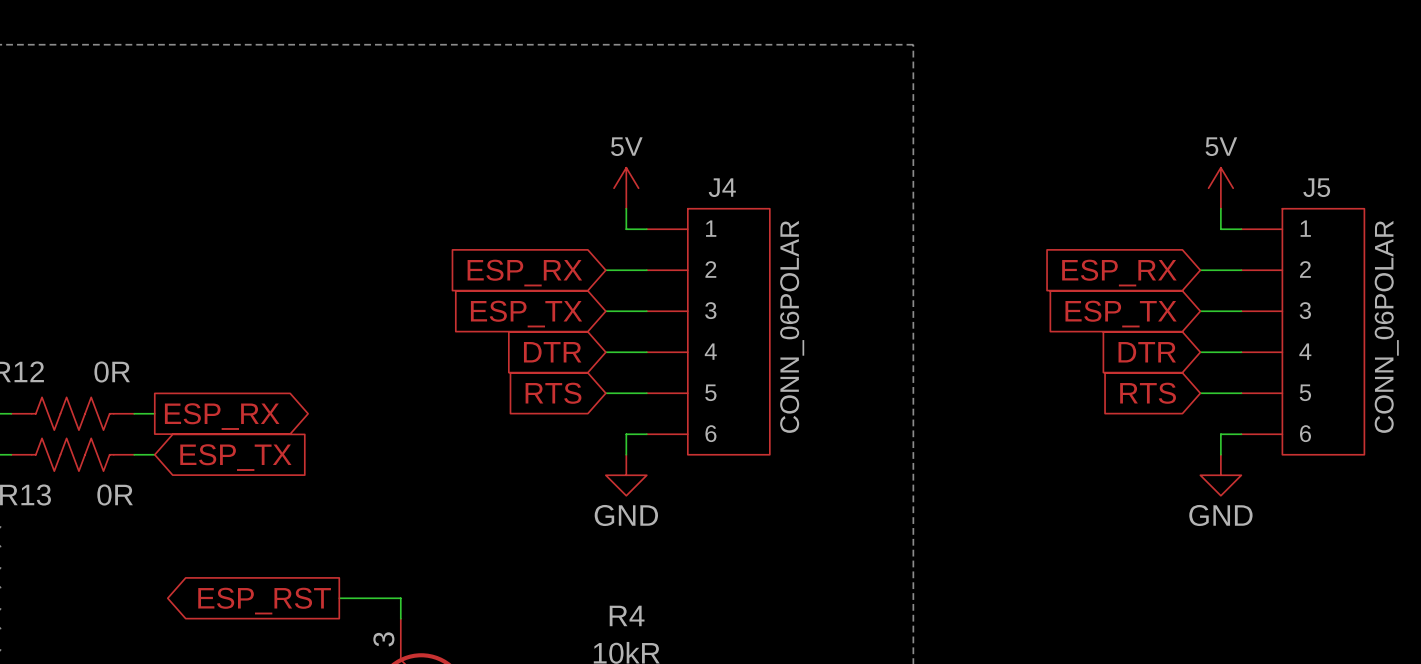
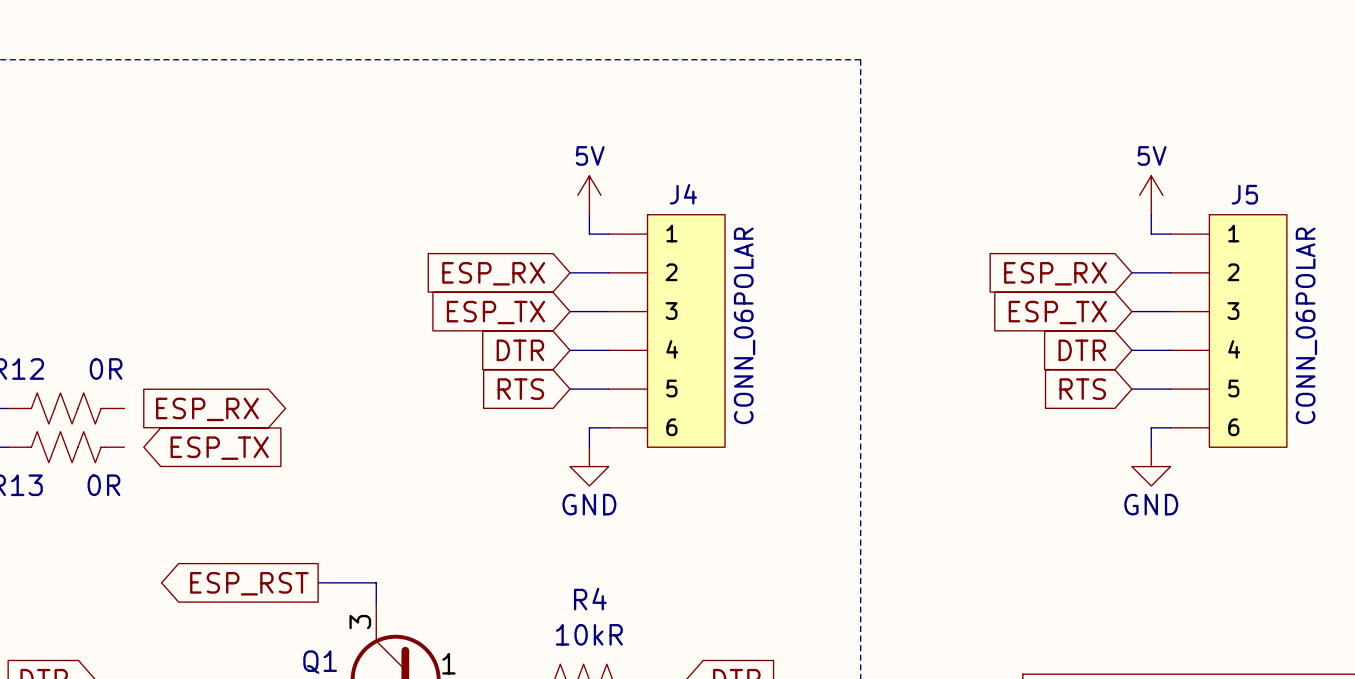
wire: (134, 413) (154, 413) -> none
wire: (134, 454) (154, 454) -> none

